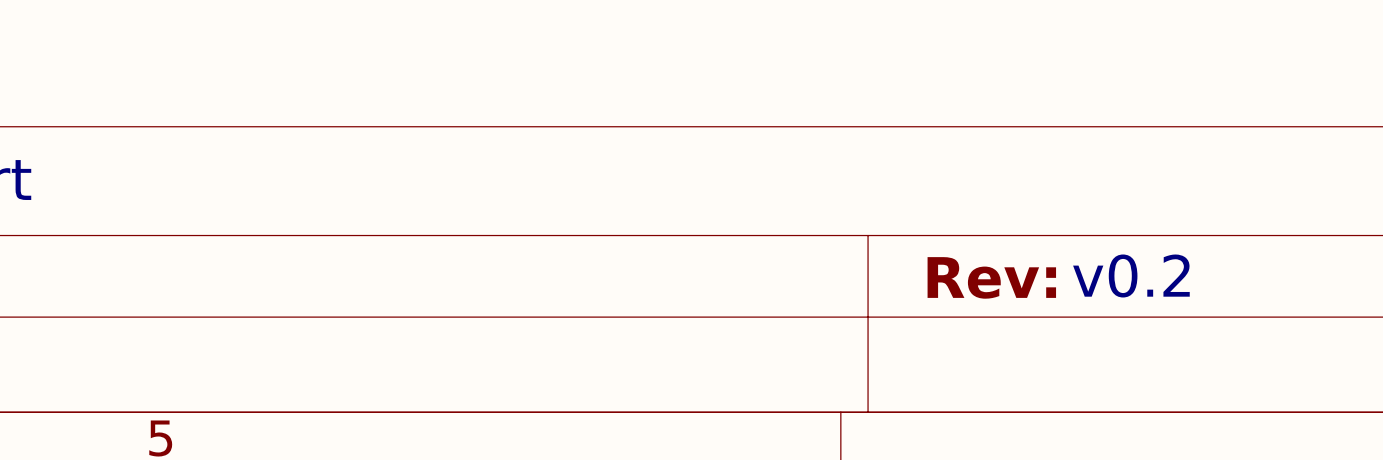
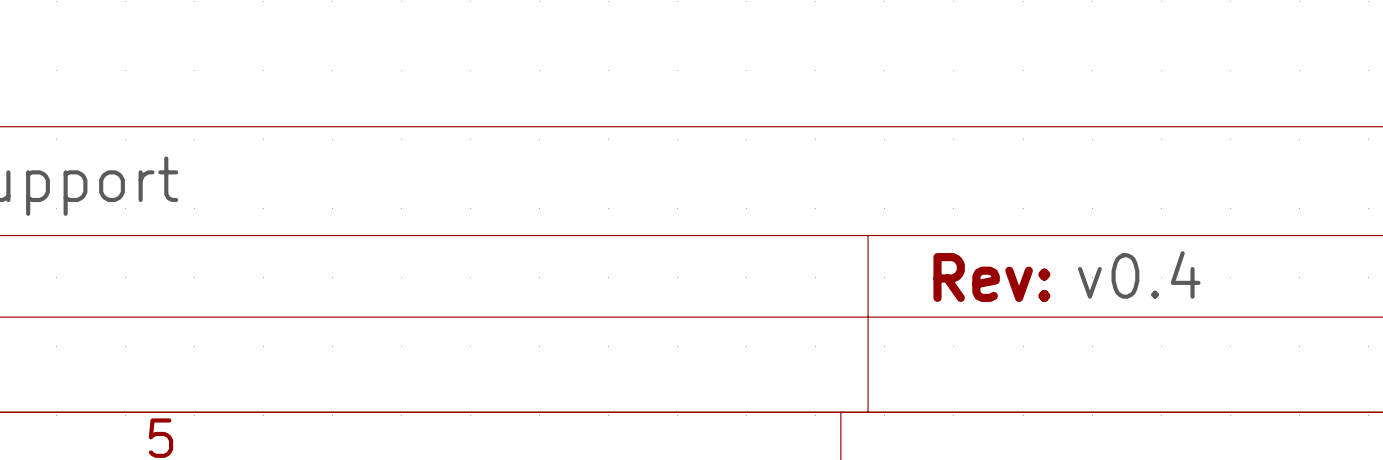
text: v0.2 (1131, 275) -> v0.4 (1139, 274)

